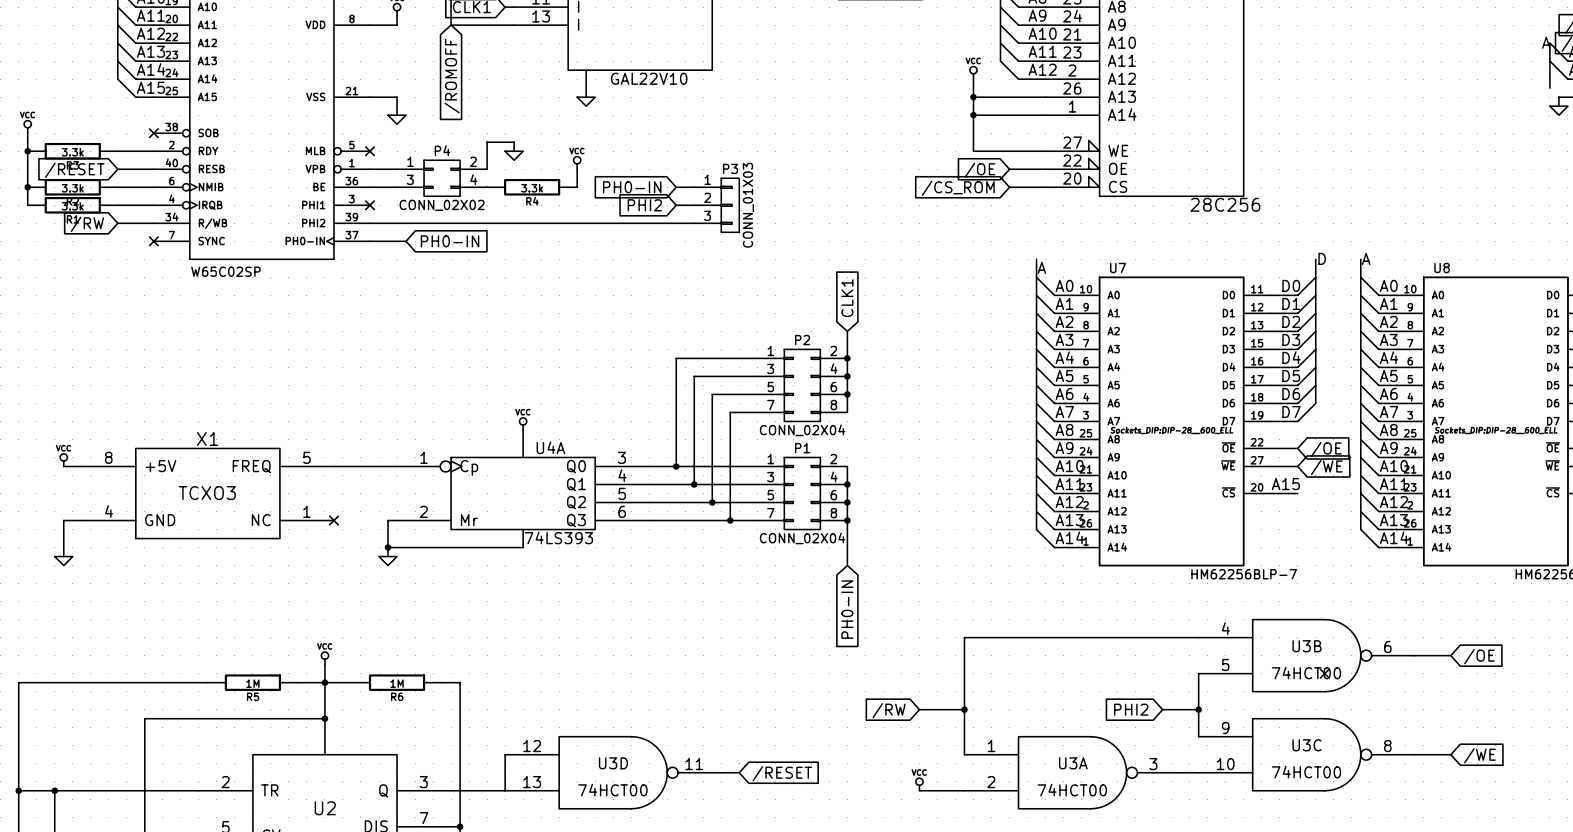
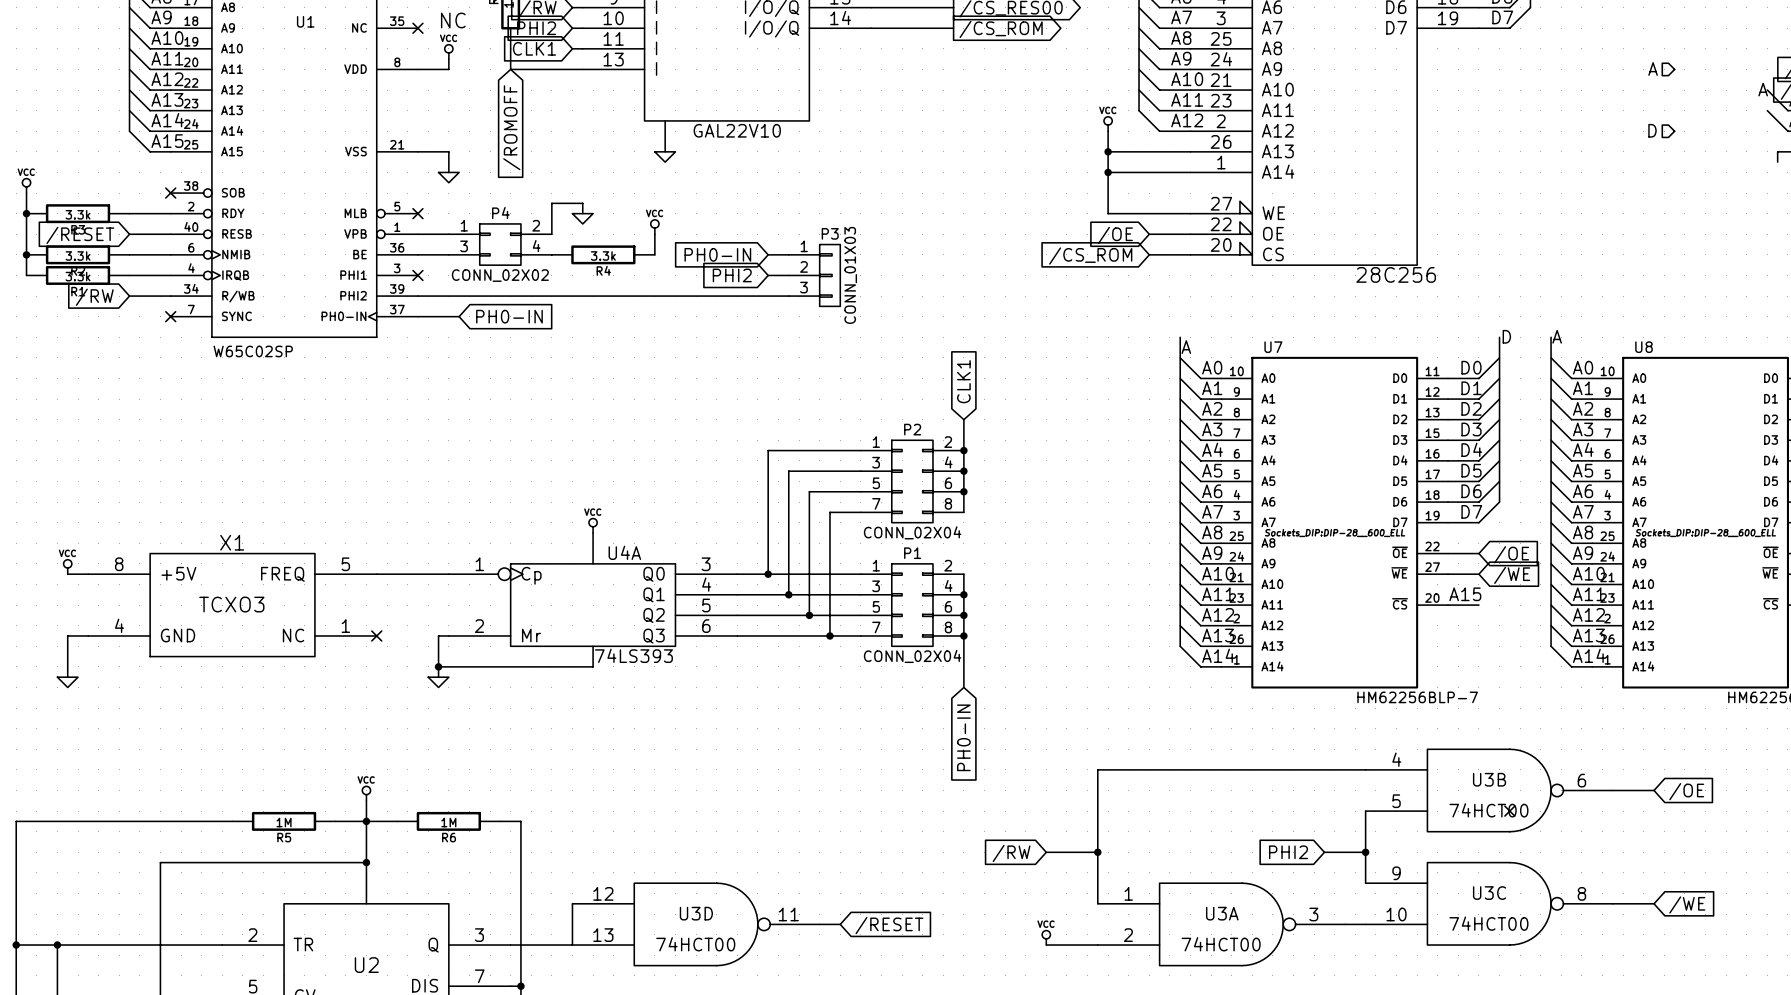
hierarchical label: none -> A (1653, 68)
bus: (1549, 43) (1549, 88) -> none
hierarchical label: none -> D (1652, 130)
power symbol: (1558, 110) -> none

